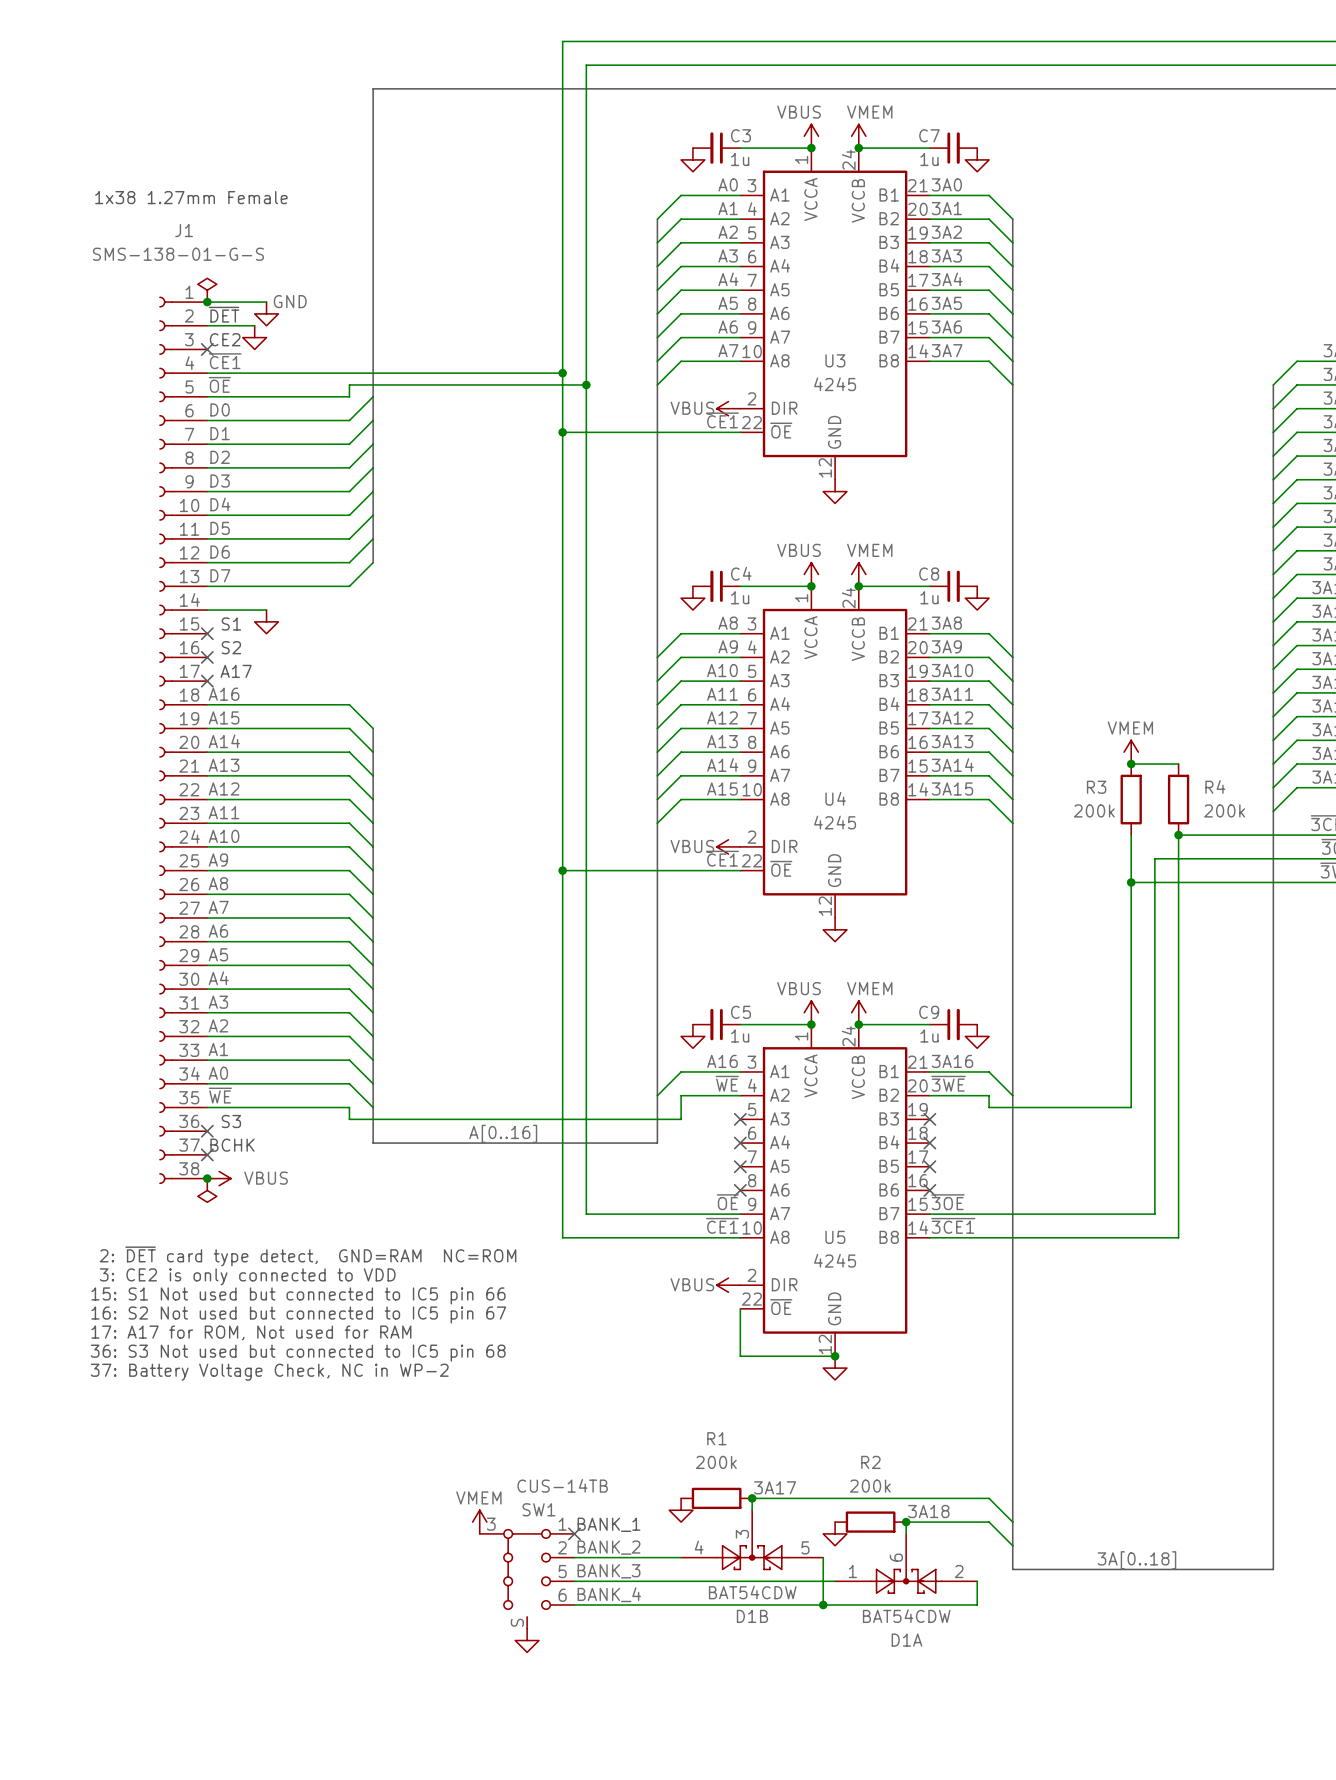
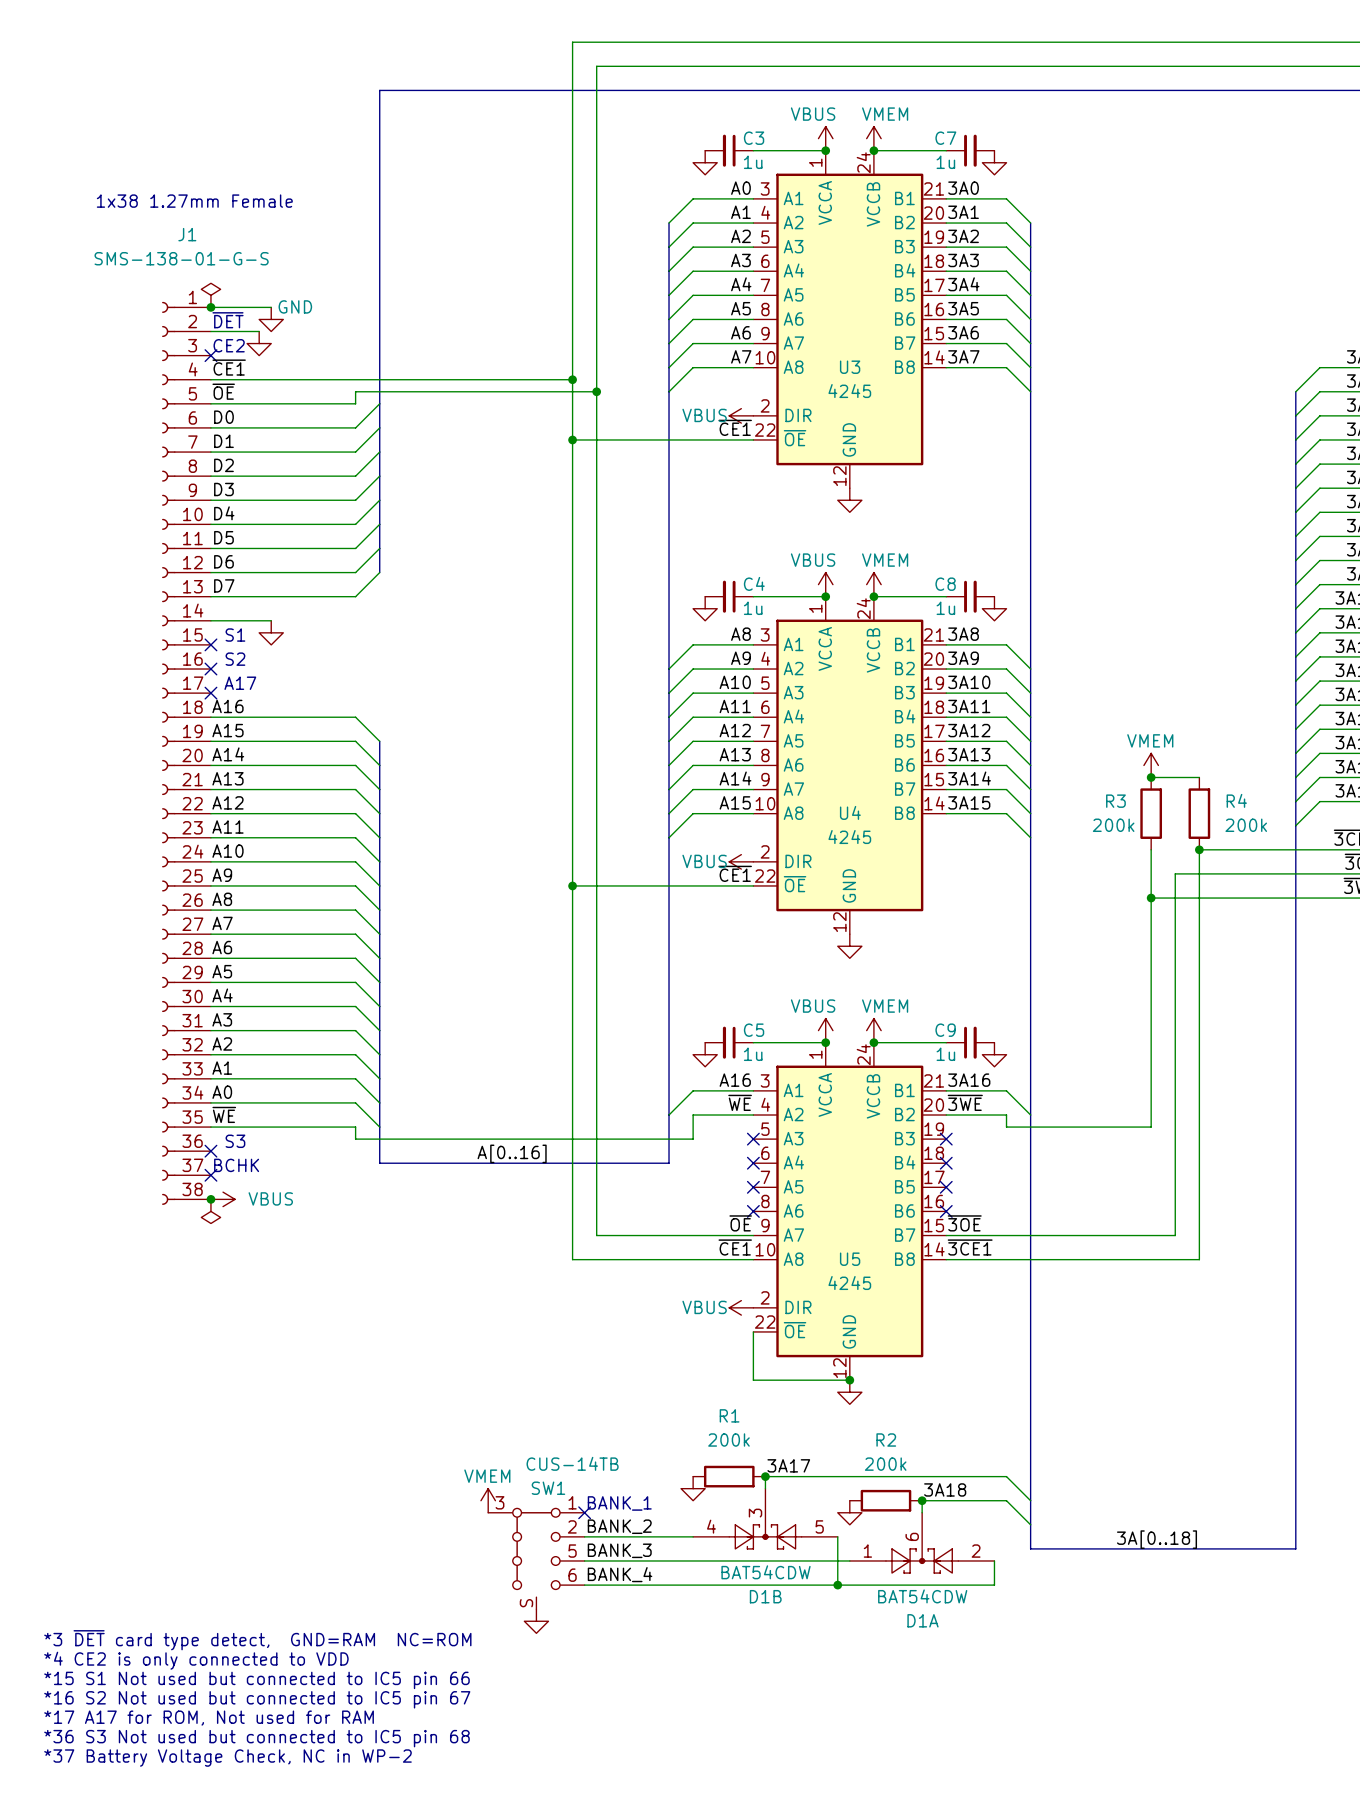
text: 2: ~{DET} card type detect, GND=RAM NC=ROM (308, 1256) -> none
text: 3: CE2 is only connected to VDD (247, 1276) -> none
text: 15: S1 Not used but connected to IC5 pin 66 (298, 1295) -> none
text: 16: S2 Not used but connected to IC5 pin 67 (298, 1315) -> none
text: 17: A17 for ROM, Not used for RAM (251, 1332) -> none
text: 36: S3 Not used but connected to IC5 pin 68 (298, 1353) -> none
text: 37: Battery Voltage Check, NC in WP-2 (269, 1372) -> none
junction: none -> (765, 1476)
junction: none -> (922, 1500)
label position: 3A17 (775, 1487) -> 3A17 (788, 1465)
R1 position: (716, 1498) -> (729, 1476)
junction: (752, 1498) -> none
label: none -> BANK_2 (619, 1526)
wire: none -> (584, 1536) (693, 1536)
power symbol position: (681, 1510) -> (693, 1488)
wire: (752, 1510) (752, 1498) (989, 1498) (1012, 1522) -> (765, 1488) (765, 1476) (1006, 1476) (1030, 1500)
label position: 3A18 (928, 1511) -> 3A18 (945, 1489)
power symbol position: VMEM (479, 1522) -> VMEM (488, 1500)
R2 position: (870, 1522) -> (885, 1500)
junction: (906, 1522) -> none
bus: (1012, 1522) (1012, 1569) (1273, 1569) (1273, 1522) -> (1030, 1548) (1295, 1548)
text position: BANK_1 (608, 1524) -> BANK_1 (619, 1503)
no-connect mark position: (574, 1533) -> (584, 1512)
power symbol position: (835, 1533) -> (849, 1512)
wire: (906, 1533) (906, 1522) (989, 1522) (1012, 1545) -> (922, 1512) (922, 1500) (1006, 1500) (1030, 1524)
wire: none -> (994, 1560) (994, 1585) (693, 1585)
D1B position: (752, 1539) -> (765, 1518)
label: BANK_2 (608, 1547) -> BANK_4 (620, 1574)
wire: (823, 1557) (823, 1605) -> (837, 1585) (837, 1536)
junction: none -> (837, 1585)
label position: 3A[0..18] (1136, 1560) -> 3A[0..18] (1156, 1539)
D1A position: (906, 1563) -> (922, 1542)
label position: BANK_3 (608, 1571) -> BANK_3 (619, 1550)
SW1 position: (527, 1579) -> (536, 1558)
wire: (574, 1581) (835, 1581) -> (584, 1560) (849, 1560)
wire: (977, 1581) (977, 1605) (574, 1605) -> none
label: BANK_4 (609, 1594) -> none
junction: (823, 1605) -> none
text: none -> *3 ~{DET} card type detect, GND=RAM NC=ROM (257, 1640)
text: none -> *4 CE2 is only connected to VDD (196, 1660)
power symbol position: (527, 1640) -> (536, 1621)
text: none -> *15 S1 Not used but connected to IC5 pin 66 (256, 1680)
text: none -> *16 S2 Not used but connected to IC5 pin 67 (257, 1699)
text: none -> *17 A17 for ROM, Not used for RAM (209, 1718)
text: none -> *36 S3 Not used but connected to IC5 pin 68 (256, 1738)
text: none -> *37 Battery Voltage Check, NC in WP-2 (227, 1758)

